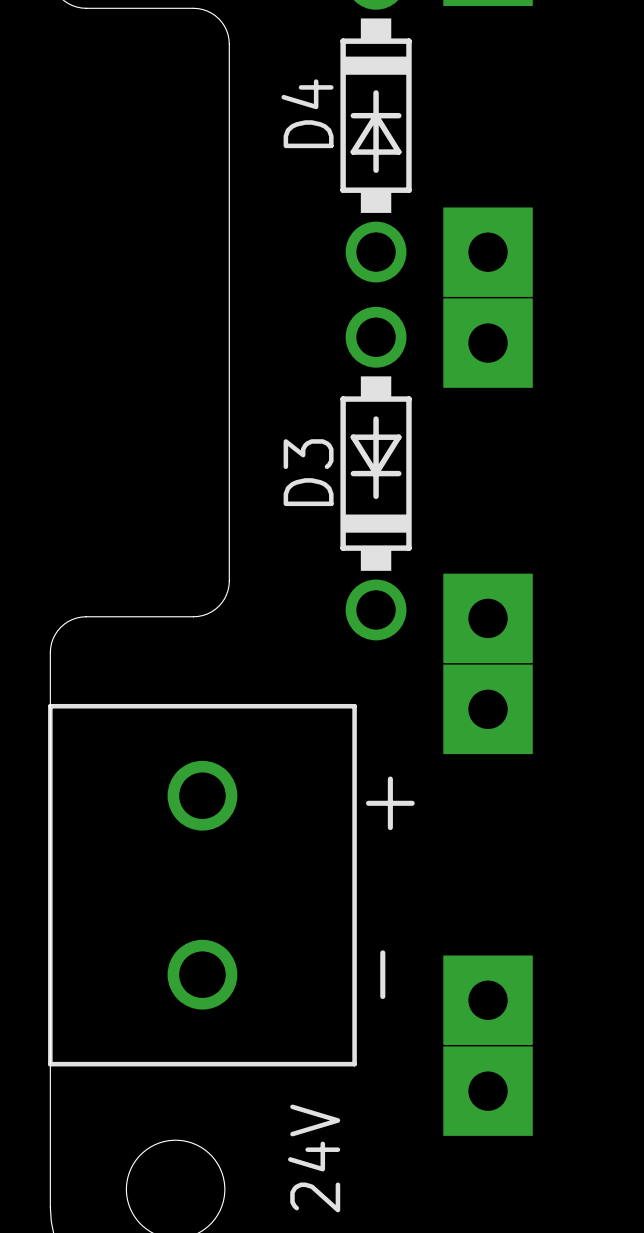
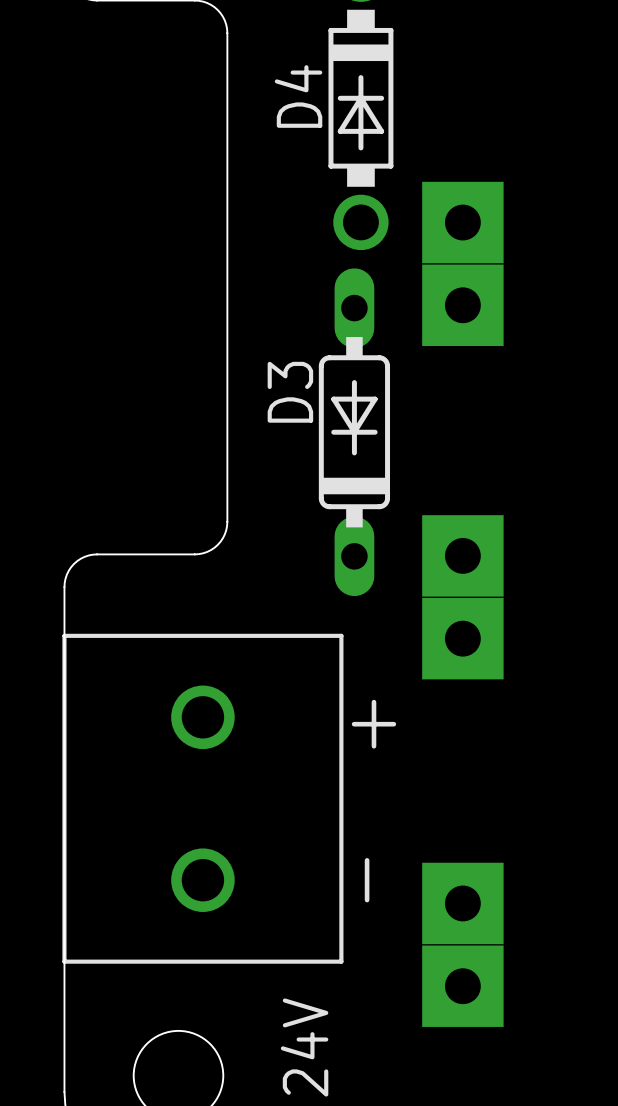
D3 footprint: [340, 306, 412, 641] -> [318, 268, 391, 597]

